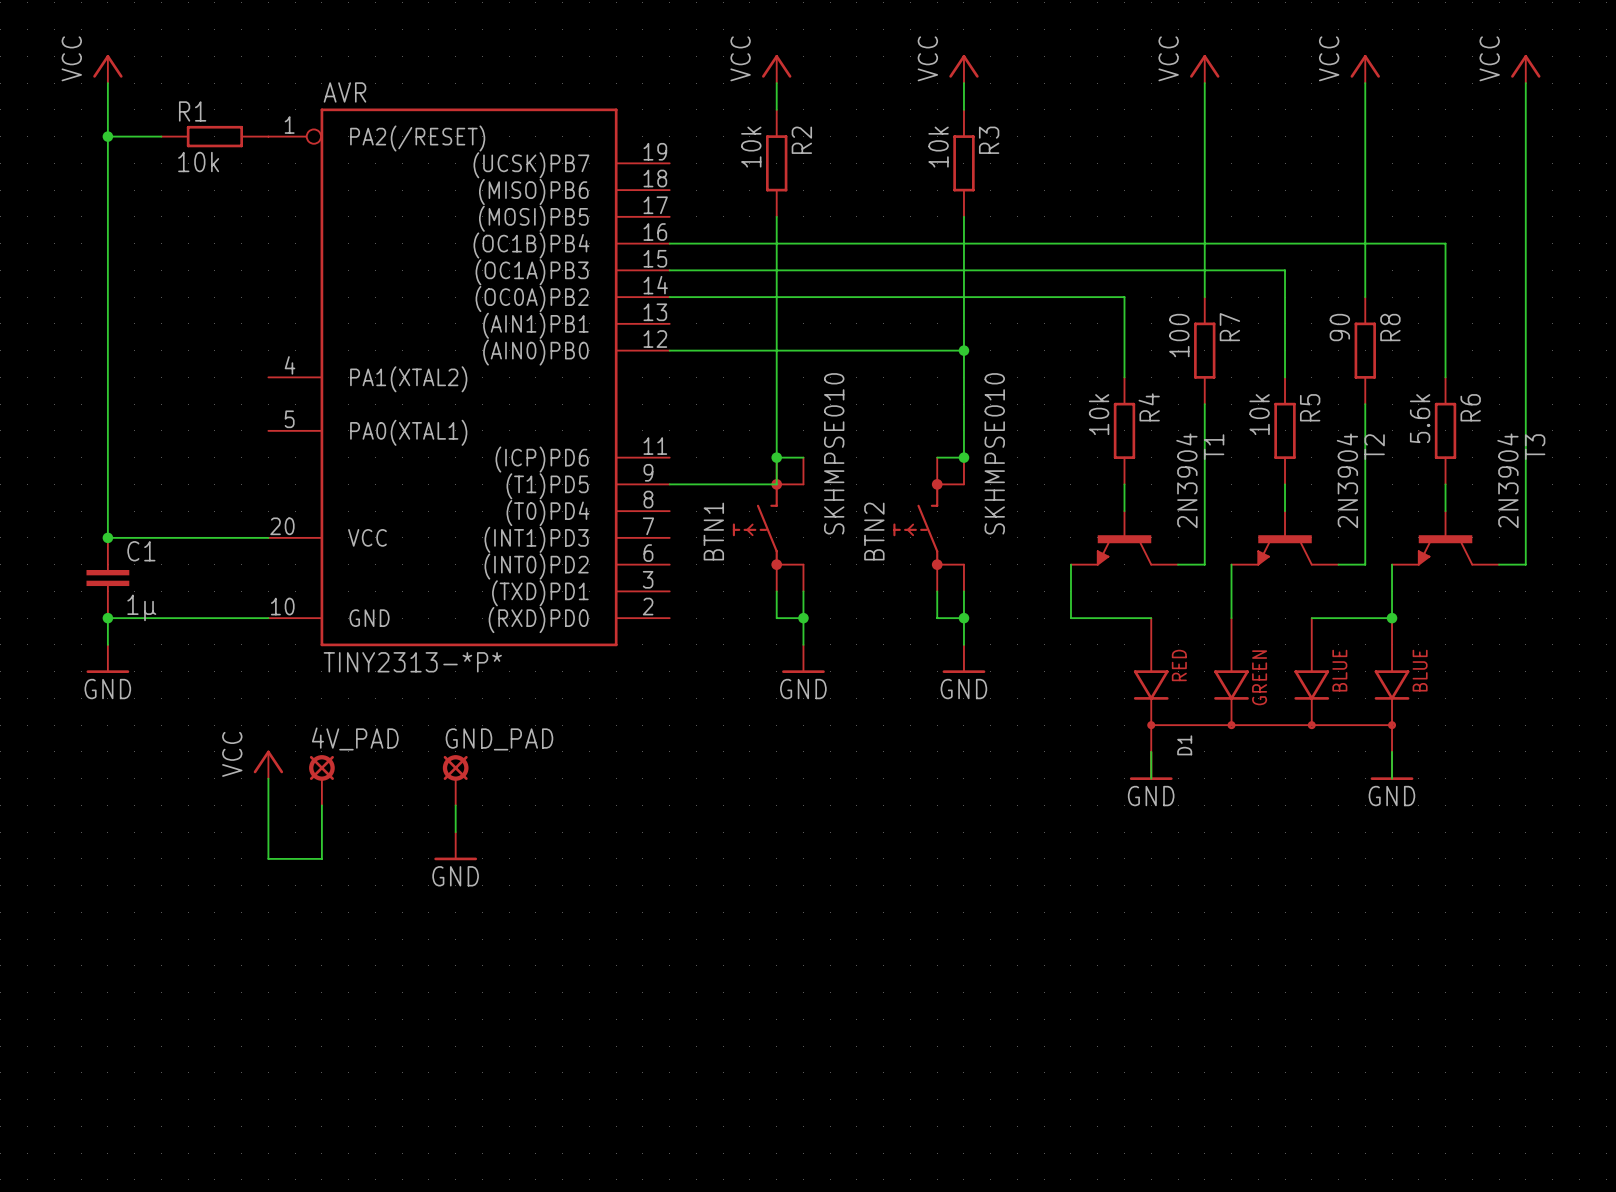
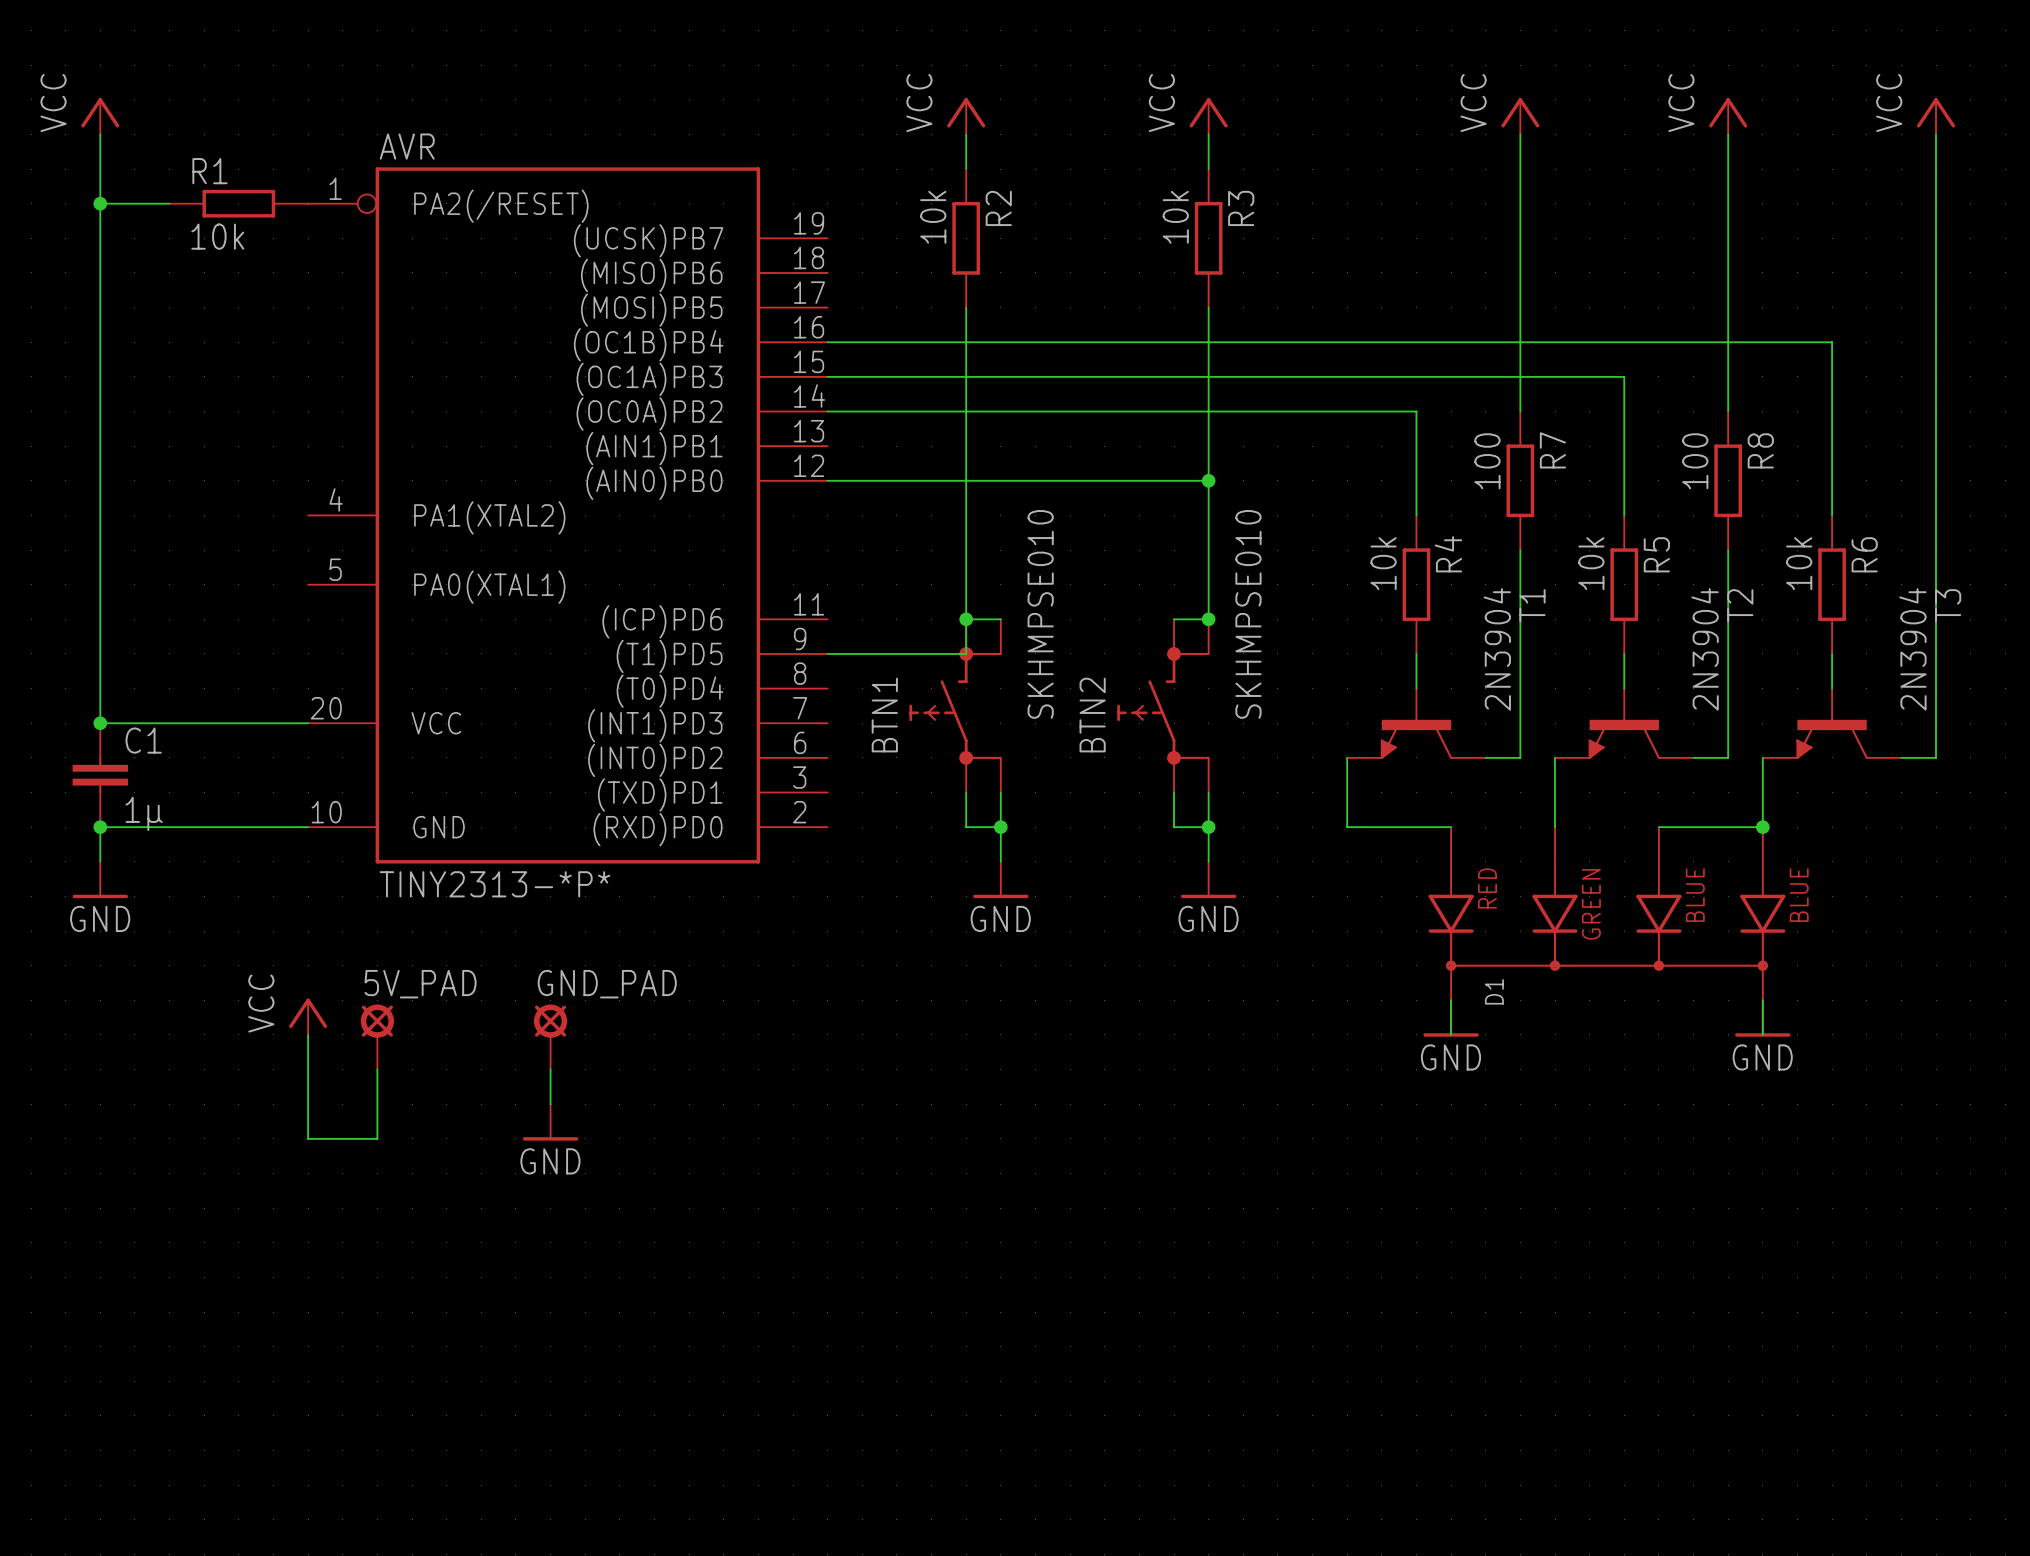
R8 value: 90 (1339, 327) -> 100 (1695, 461)
R6 value: 5.6k (1420, 418) -> 10k (1799, 563)
4V_PAD name: 4V_PAD (355, 738) -> 5V_PAD (420, 984)

